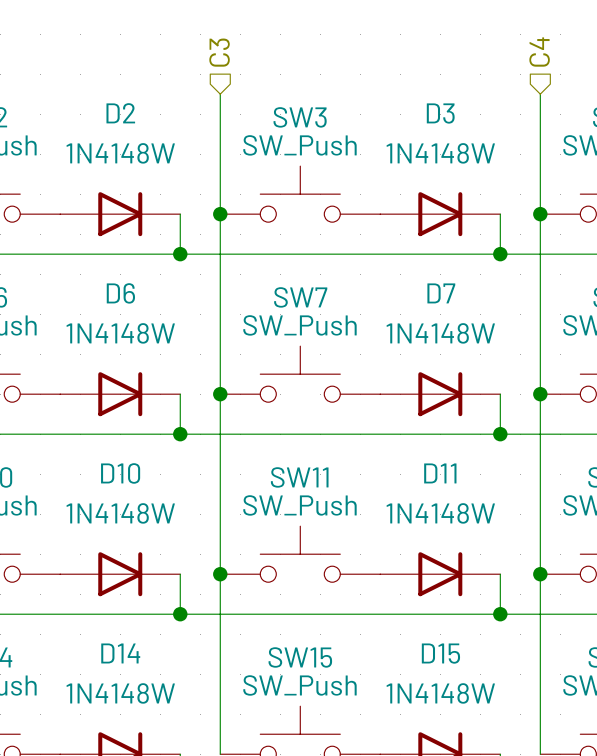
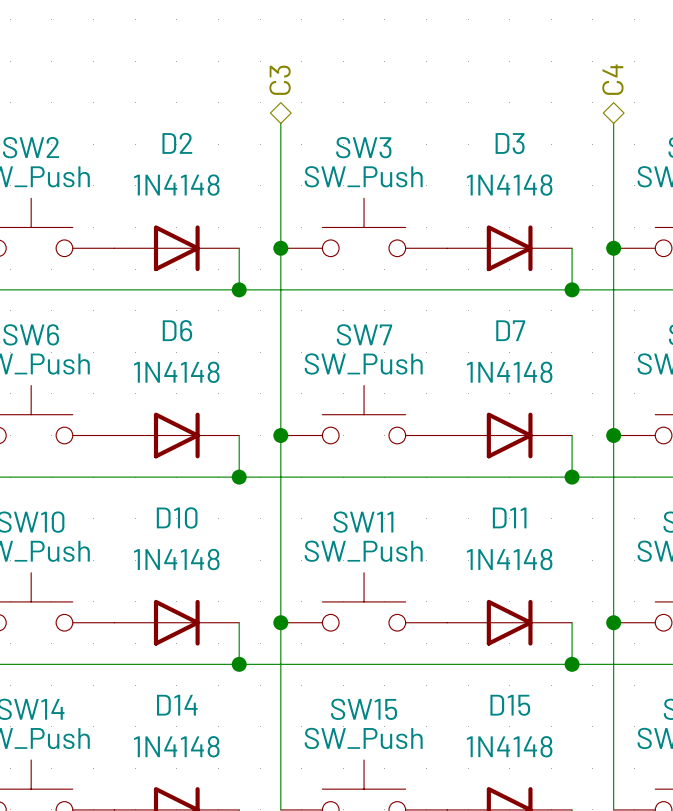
hierarchical label shape: input (219, 52) -> bidirectional (280, 80)
hierarchical label shape: input (539, 52) -> bidirectional (612, 79)
D2 value: 1N4148W (120, 153) -> 1N4148 (176, 185)
D3 value: 1N4148W (440, 153) -> 1N4148 (509, 185)
D6 value: 1N4148W (120, 333) -> 1N4148 (176, 372)
D7 value: 1N4148W (440, 333) -> 1N4148 (509, 372)
D10 value: 1N4148W (120, 513) -> 1N4148 (176, 559)
D11 value: 1N4148W (440, 513) -> 1N4148 (509, 559)
D14 value: 1N4148W (120, 693) -> 1N4148 (176, 746)
D15 value: 1N4148W (440, 693) -> 1N4148 (509, 746)

